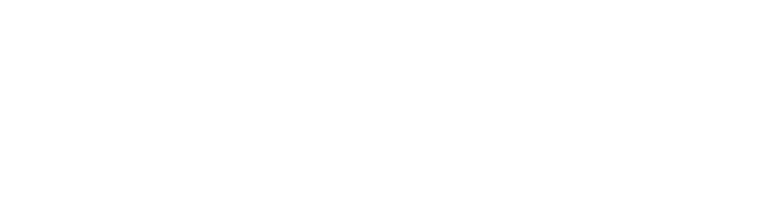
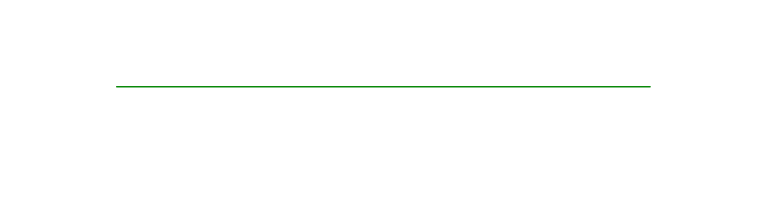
wire: none -> (116, 86) (650, 86)

